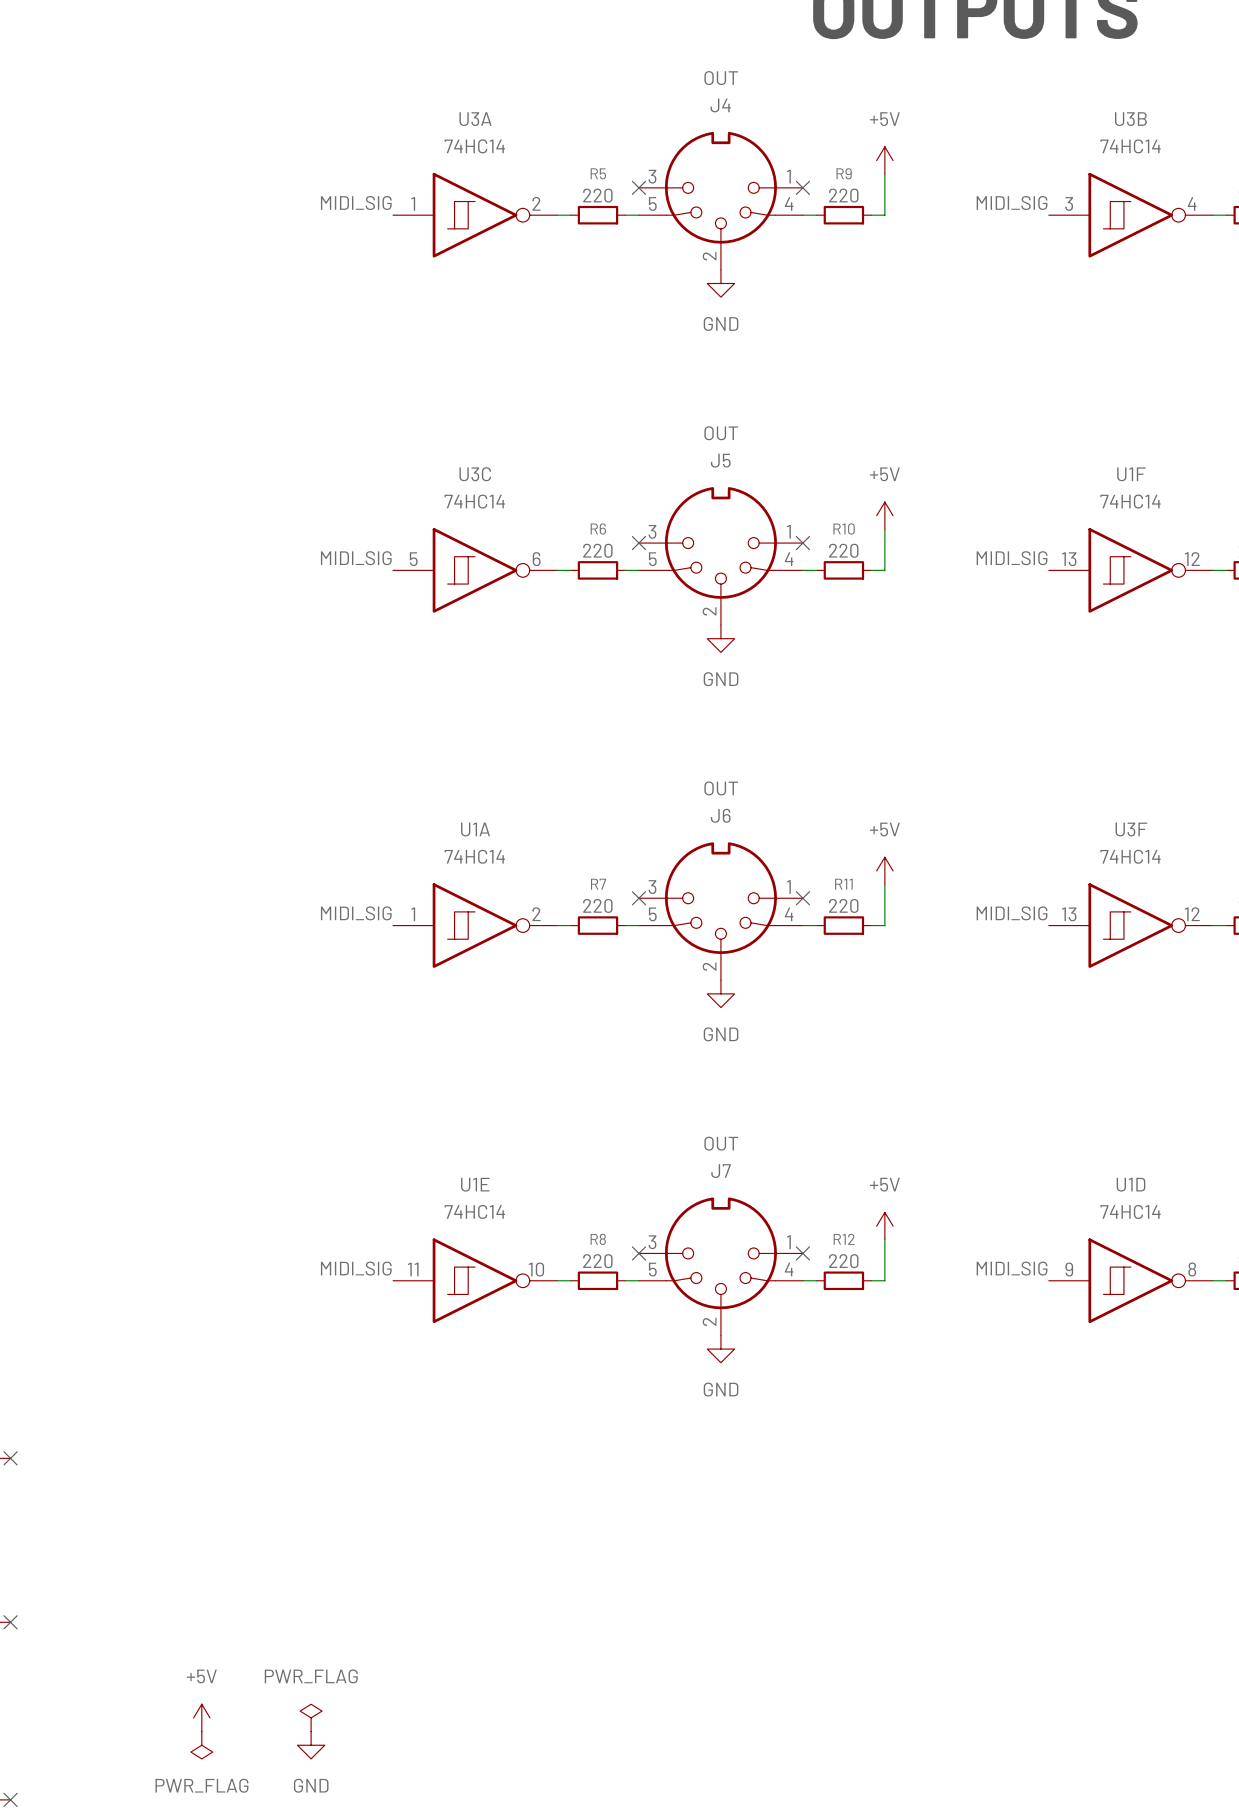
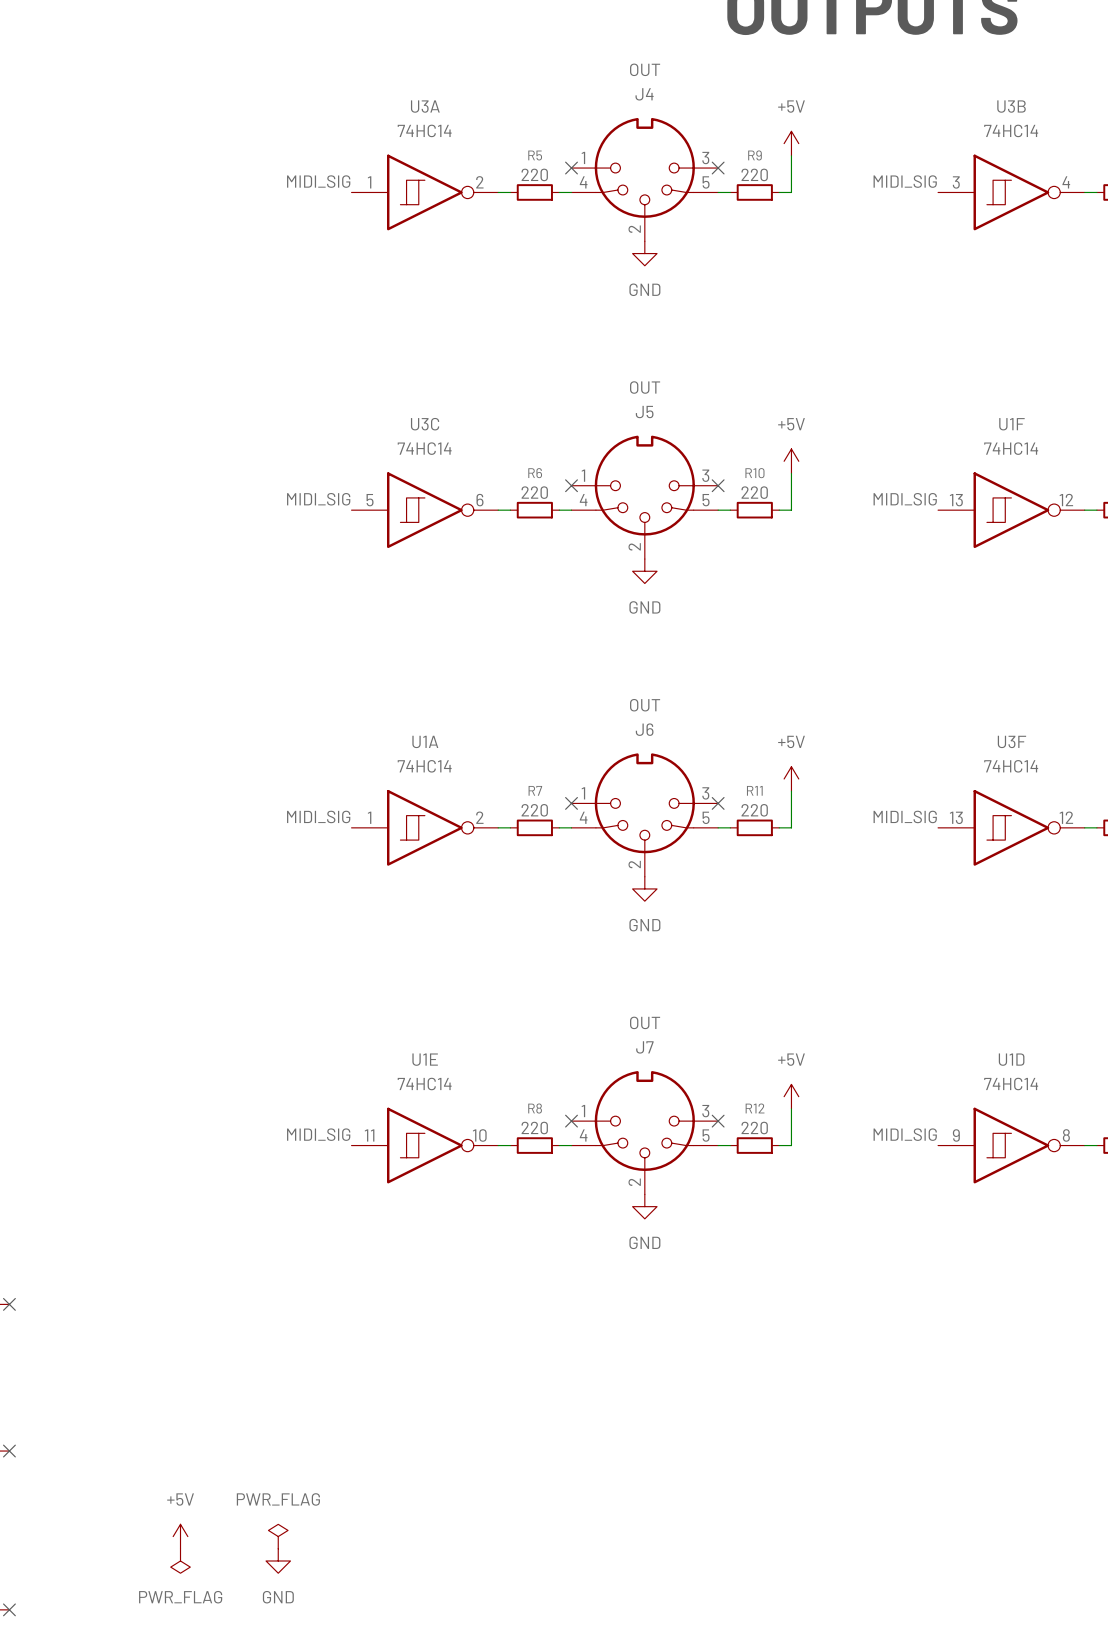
J4 flip: as is (720, 187) -> left-right (644, 167)
J5 flip: as is (720, 542) -> left-right (644, 485)
J6 flip: as is (720, 898) -> left-right (644, 803)
J7 flip: as is (720, 1253) -> left-right (644, 1121)

